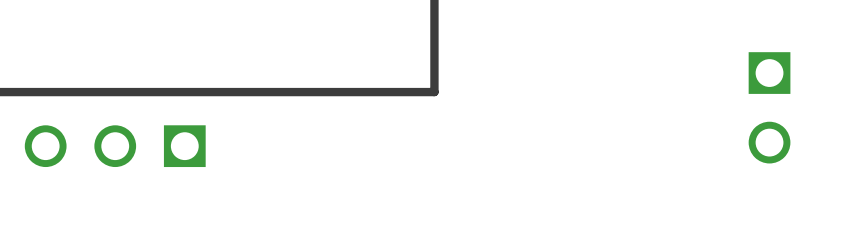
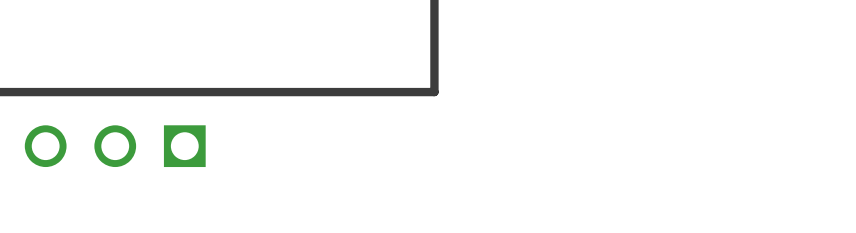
part: (769, 107) -> none

